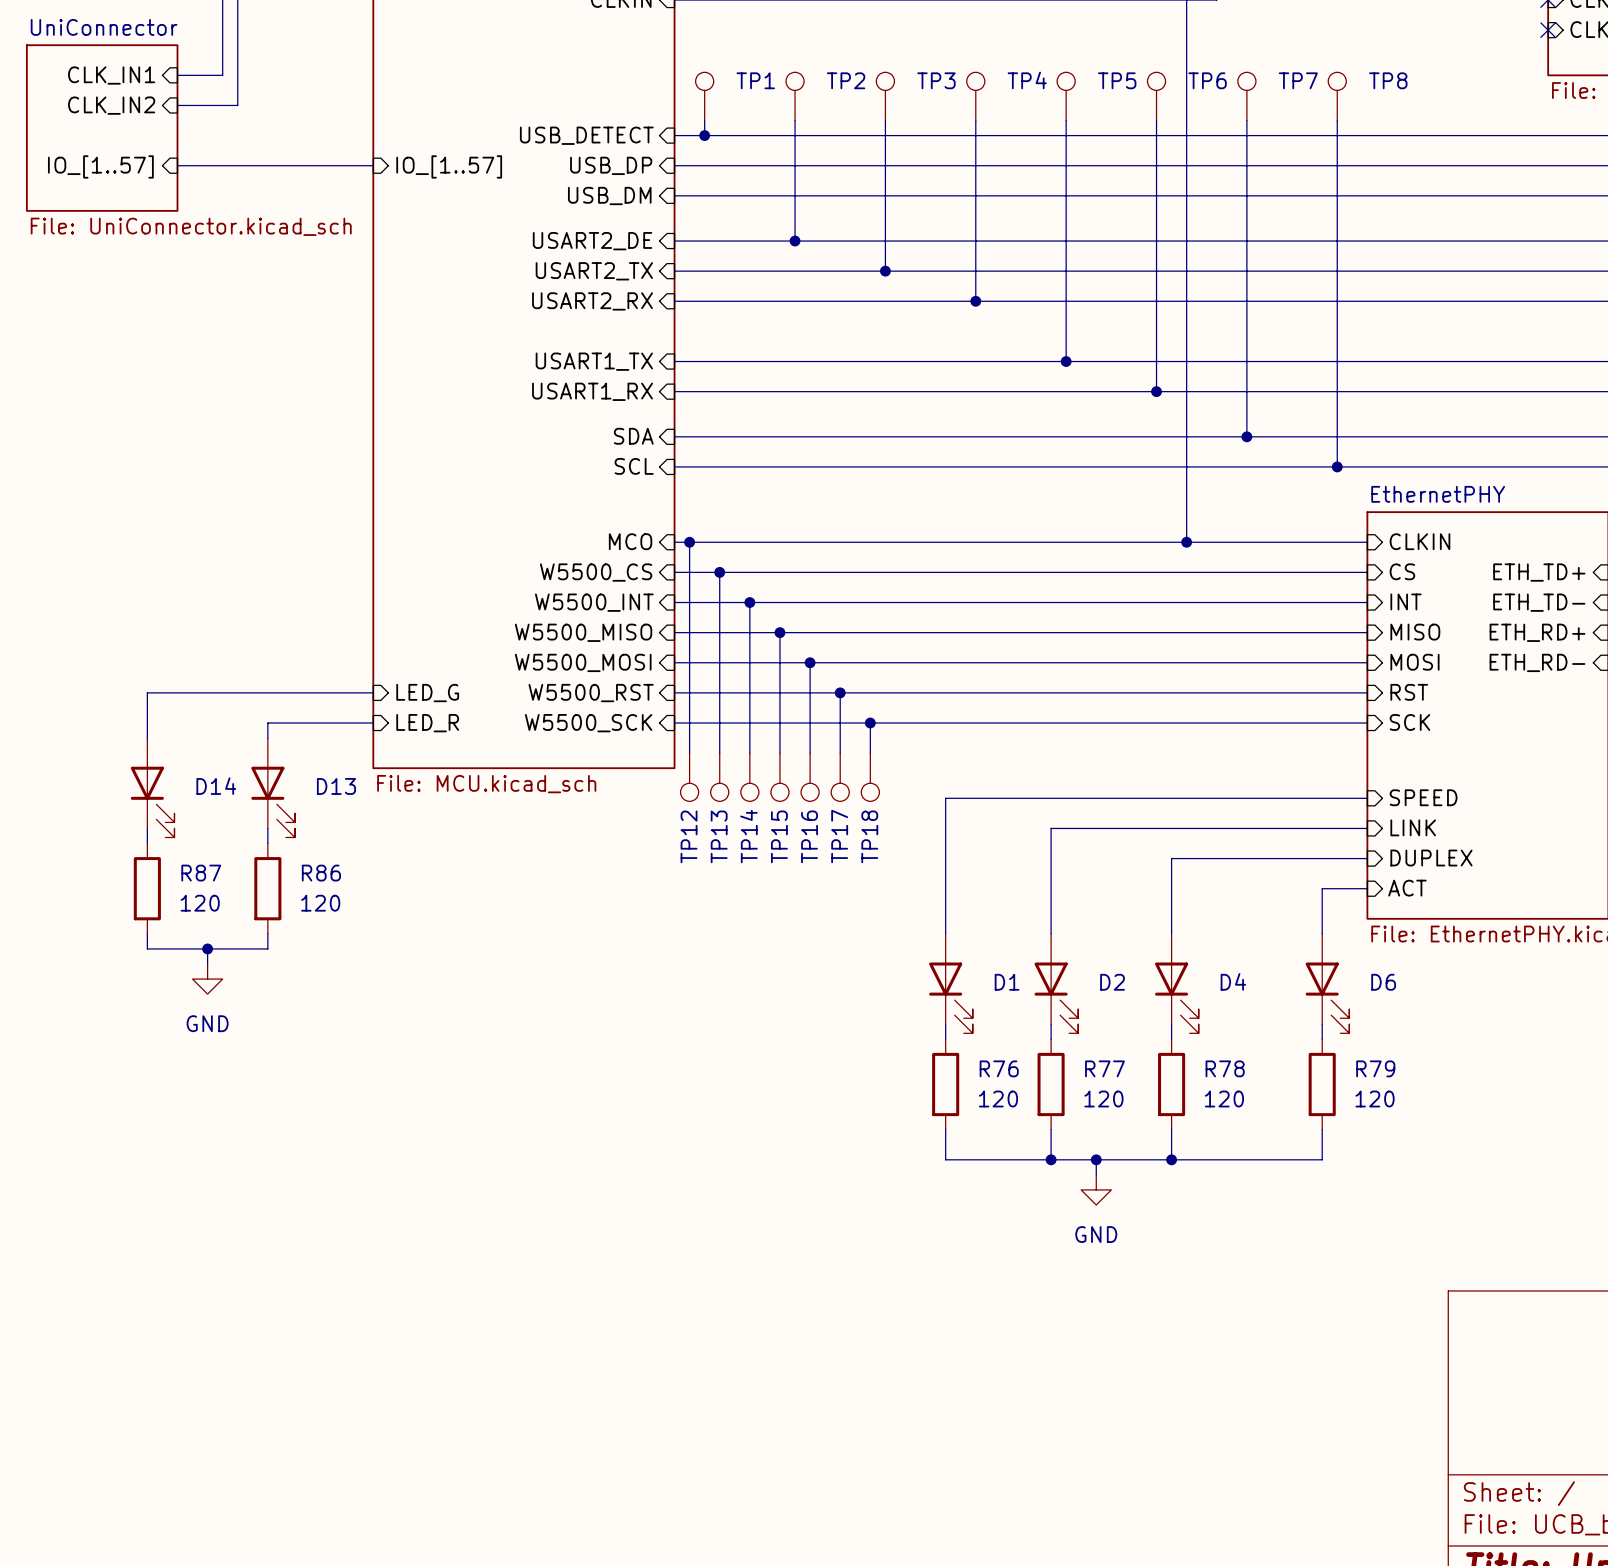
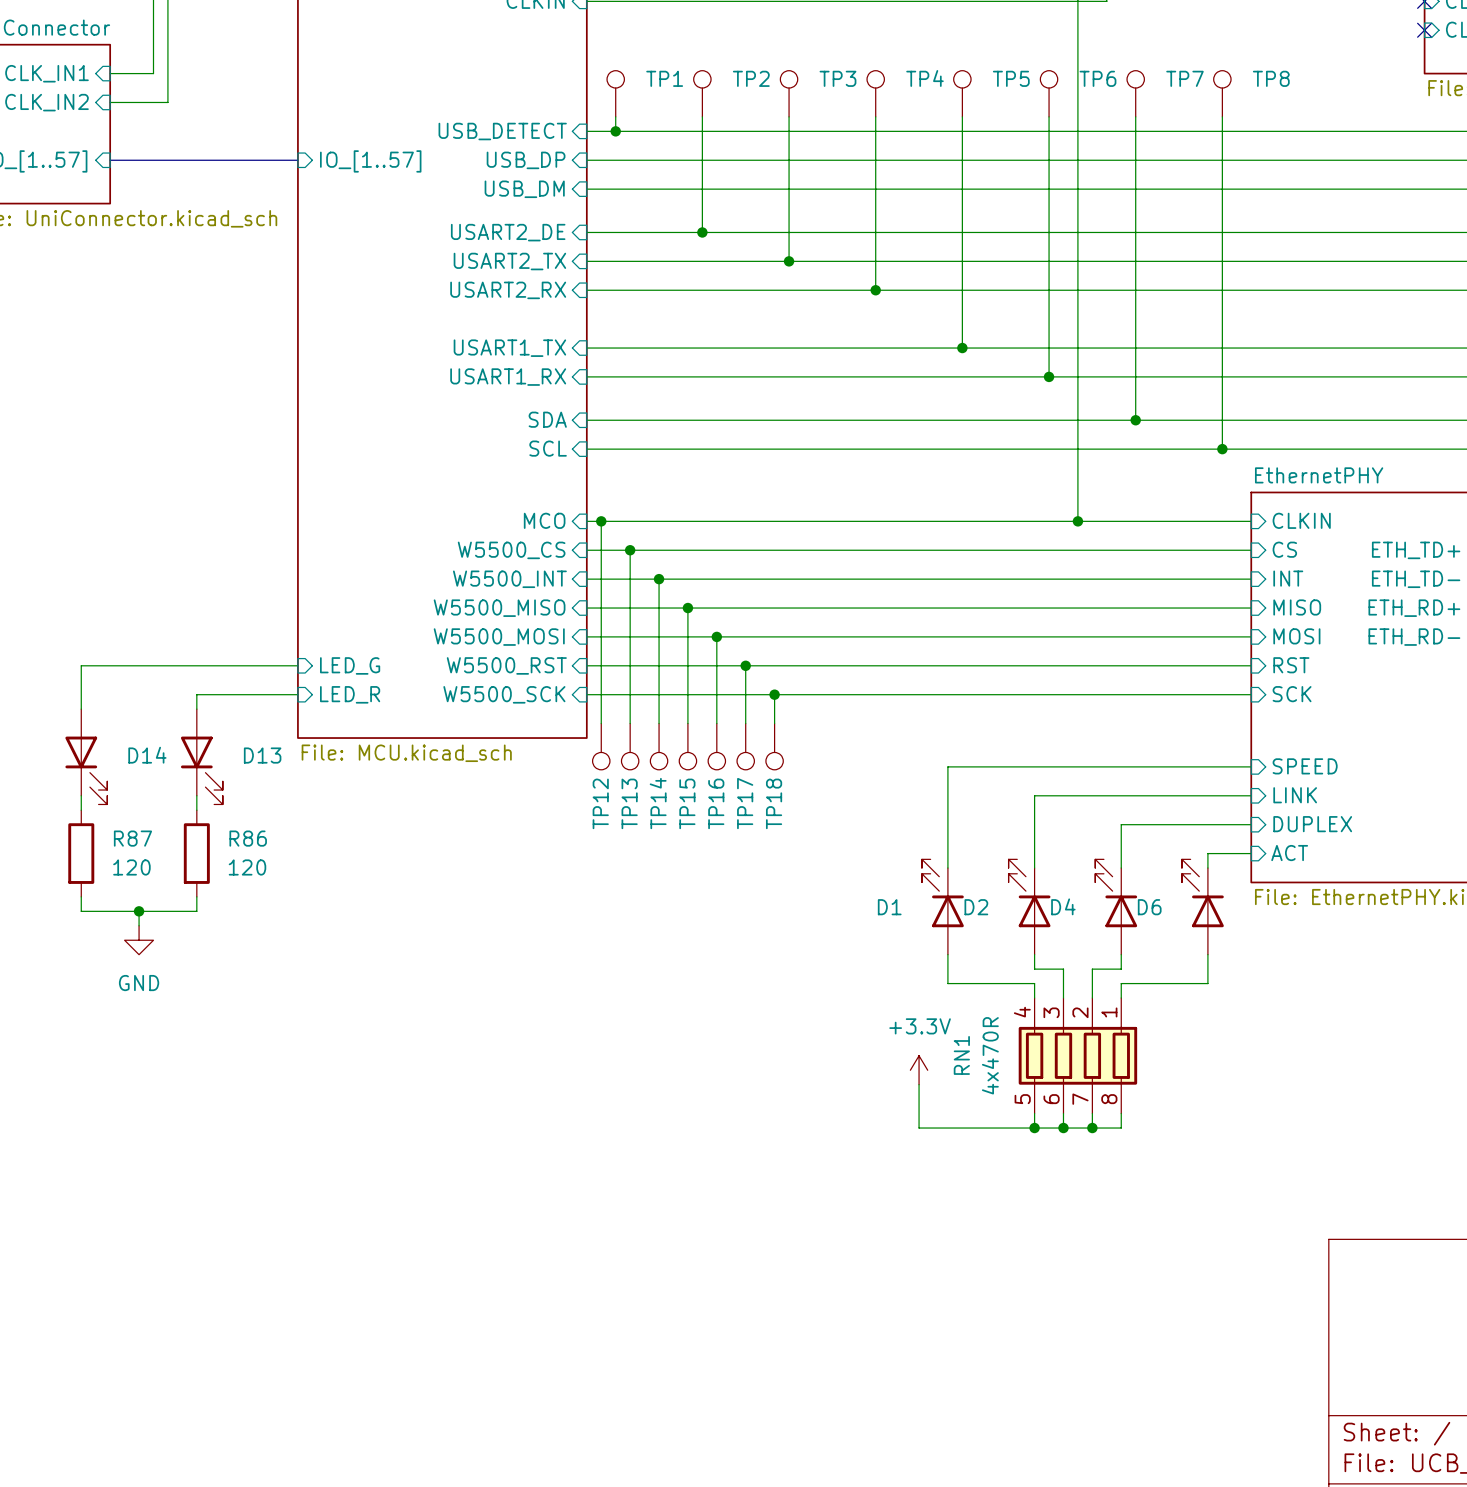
wire: (1051, 798) (945, 798) (945, 933) -> none
wire: (1051, 828) (1141, 828) -> (947, 795) (947, 766)
wire: none -> (1034, 795) (1034, 868)
wire: (1231, 858) (1171, 858) (1171, 933) -> (1121, 824) (1121, 868)
D1 position: (950, 983) -> (942, 907)
D2 position: (1056, 983) -> (1029, 907)
D4 position: (1176, 983) -> (1116, 907)
wire: none -> (947, 954) (947, 983) (1034, 983) (1034, 998)
wire: none -> (1034, 954) (1034, 969) (1063, 969) (1063, 983)
wire: none -> (1121, 954) (1121, 969) (1092, 969) (1092, 998)
wire: none -> (1207, 954) (1207, 983) (1121, 983) (1121, 998)
D1 rotation: 0° (950, 997) -> 180° (942, 893)
D2 rotation: 0° (1056, 997) -> 180° (1029, 893)
D4 rotation: 0° (1176, 997) -> 180° (1116, 893)
D6 rotation: 0° (1327, 997) -> 180° (1202, 893)
wire: (945, 1024) (945, 1039) -> none
wire: (1051, 1024) (1051, 1039) -> none
wire: (1322, 1024) (1322, 1039) -> (1092, 1113) (1092, 1128)
R76: 120 (945, 1084) -> none
R77: 120 (1051, 1084) -> none
R78: 120 (1171, 1084) -> none
R79: 120 (1322, 1084) -> none
RN1: none -> 4x470R (1077, 1055)
power symbol: none -> +3.3V (919, 1070)
wire: (945, 1129) (945, 1159) (1322, 1159) (1322, 1129) -> none
wire: none -> (919, 1084) (919, 1128) (1121, 1128) (1121, 1113)
wire: (1051, 1129) (1051, 1159) -> none
junction: (1051, 1159) -> none
wire: (1096, 1159) (1096, 1174) -> (1034, 1113) (1034, 1128)
junction: (1096, 1159) -> none
junction position: (1171, 1159) -> (1063, 1128)
junction: none -> (1034, 1128)
junction: none -> (1092, 1128)
power symbol: GND (1096, 1189) -> none

